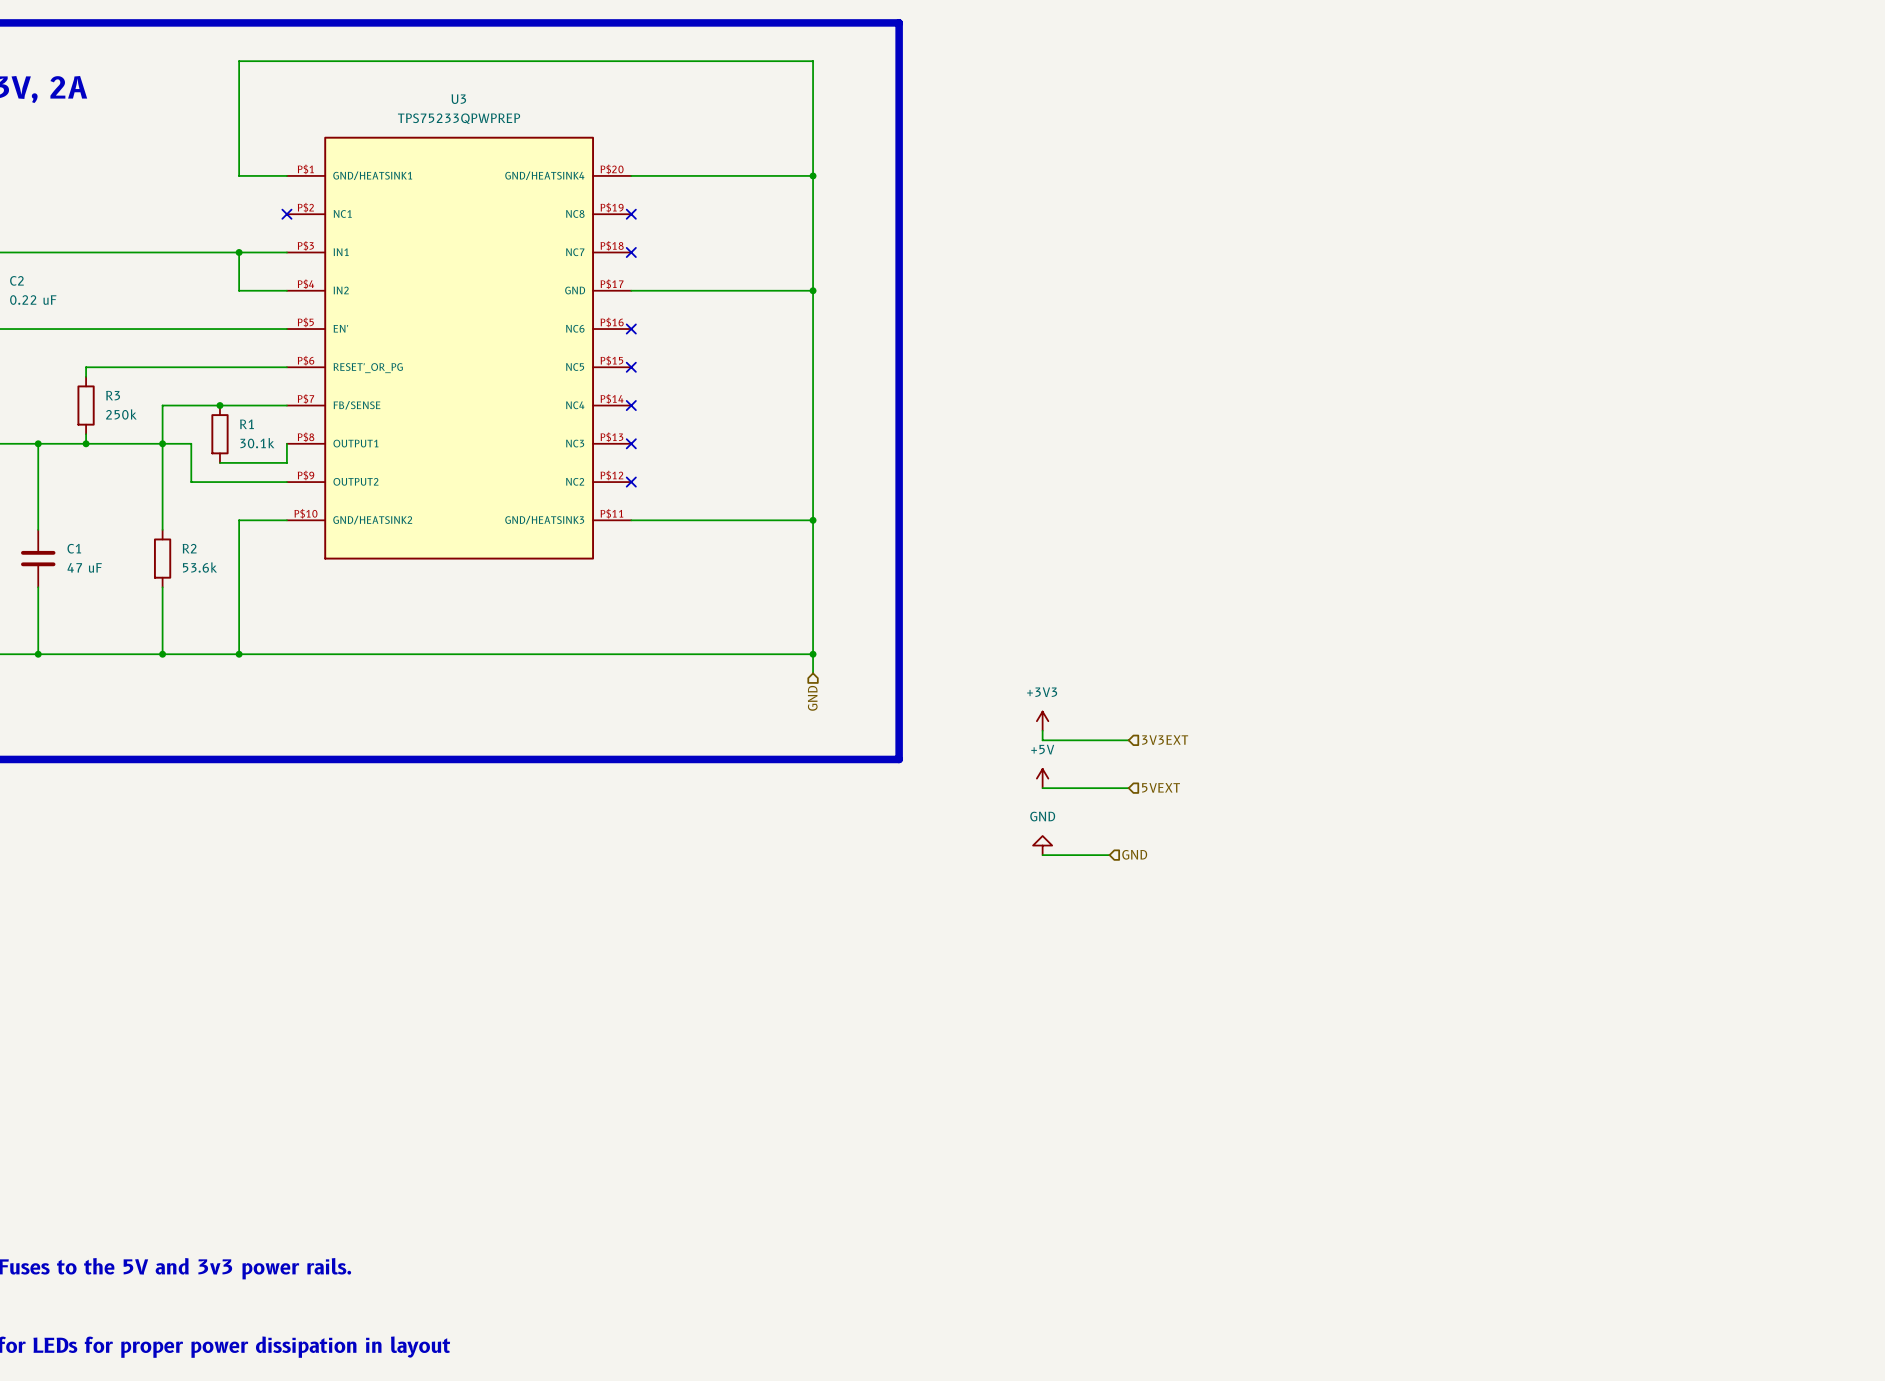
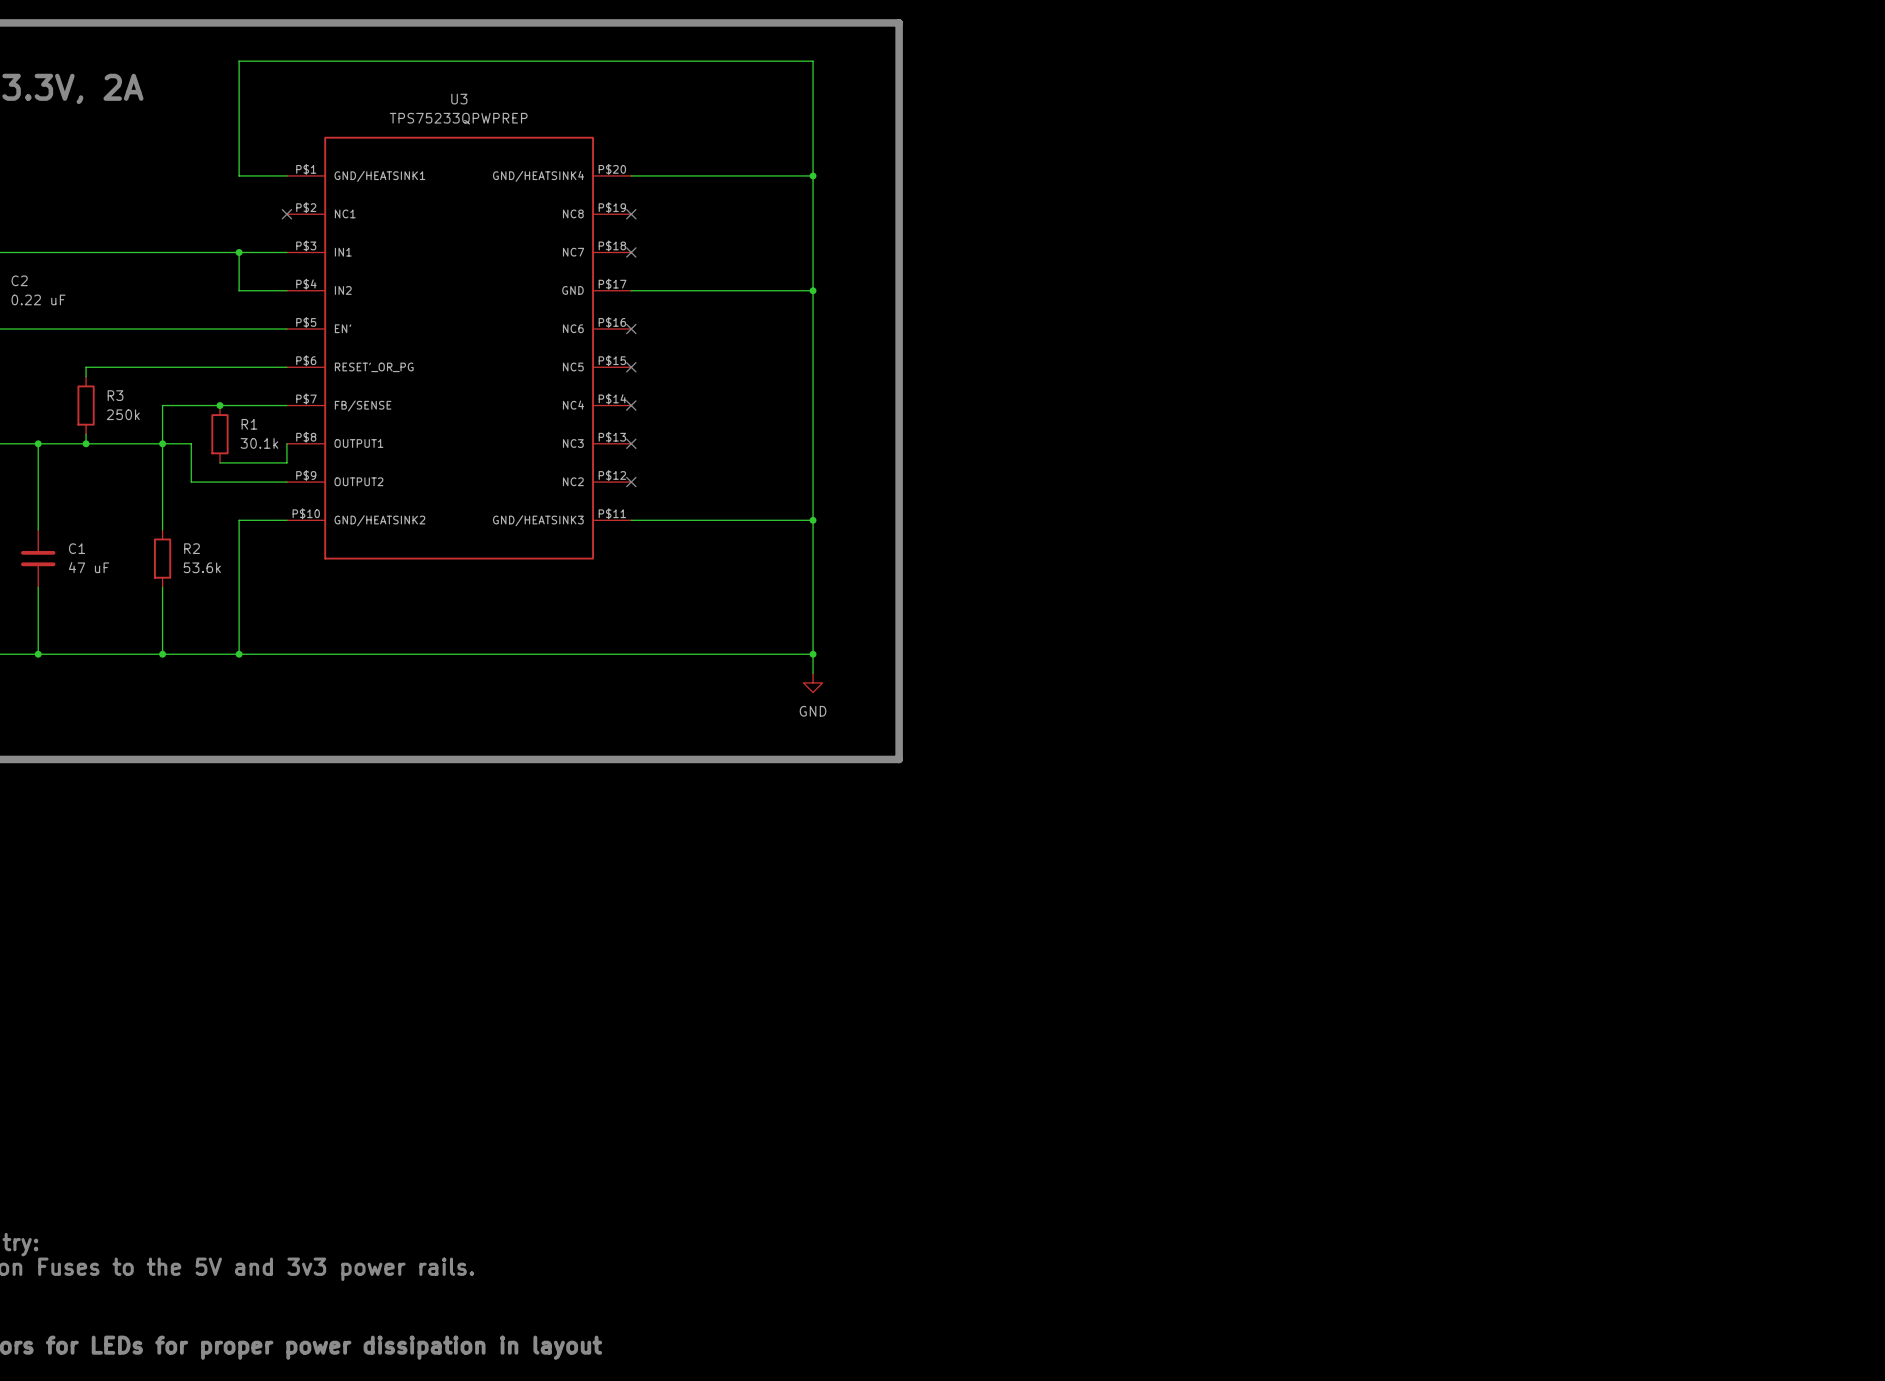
power symbol: none -> GND (813, 682)
hierarchical label: GND (812, 698) -> none
power symbol: +3V3 (1042, 721) -> none
wire: (1042, 730) (1042, 740) (1128, 740) -> none
hierarchical label: 3V3EXT (1165, 740) -> none
power symbol: +5V (1042, 778) -> none
hierarchical label: 5VEXT (1161, 787) -> none
wire: (1042, 788) (1128, 788) -> none
power symbol: GND (1042, 845) -> none
hierarchical label: GND (1134, 854) -> none
wire: (1042, 855) (1109, 855) -> none

